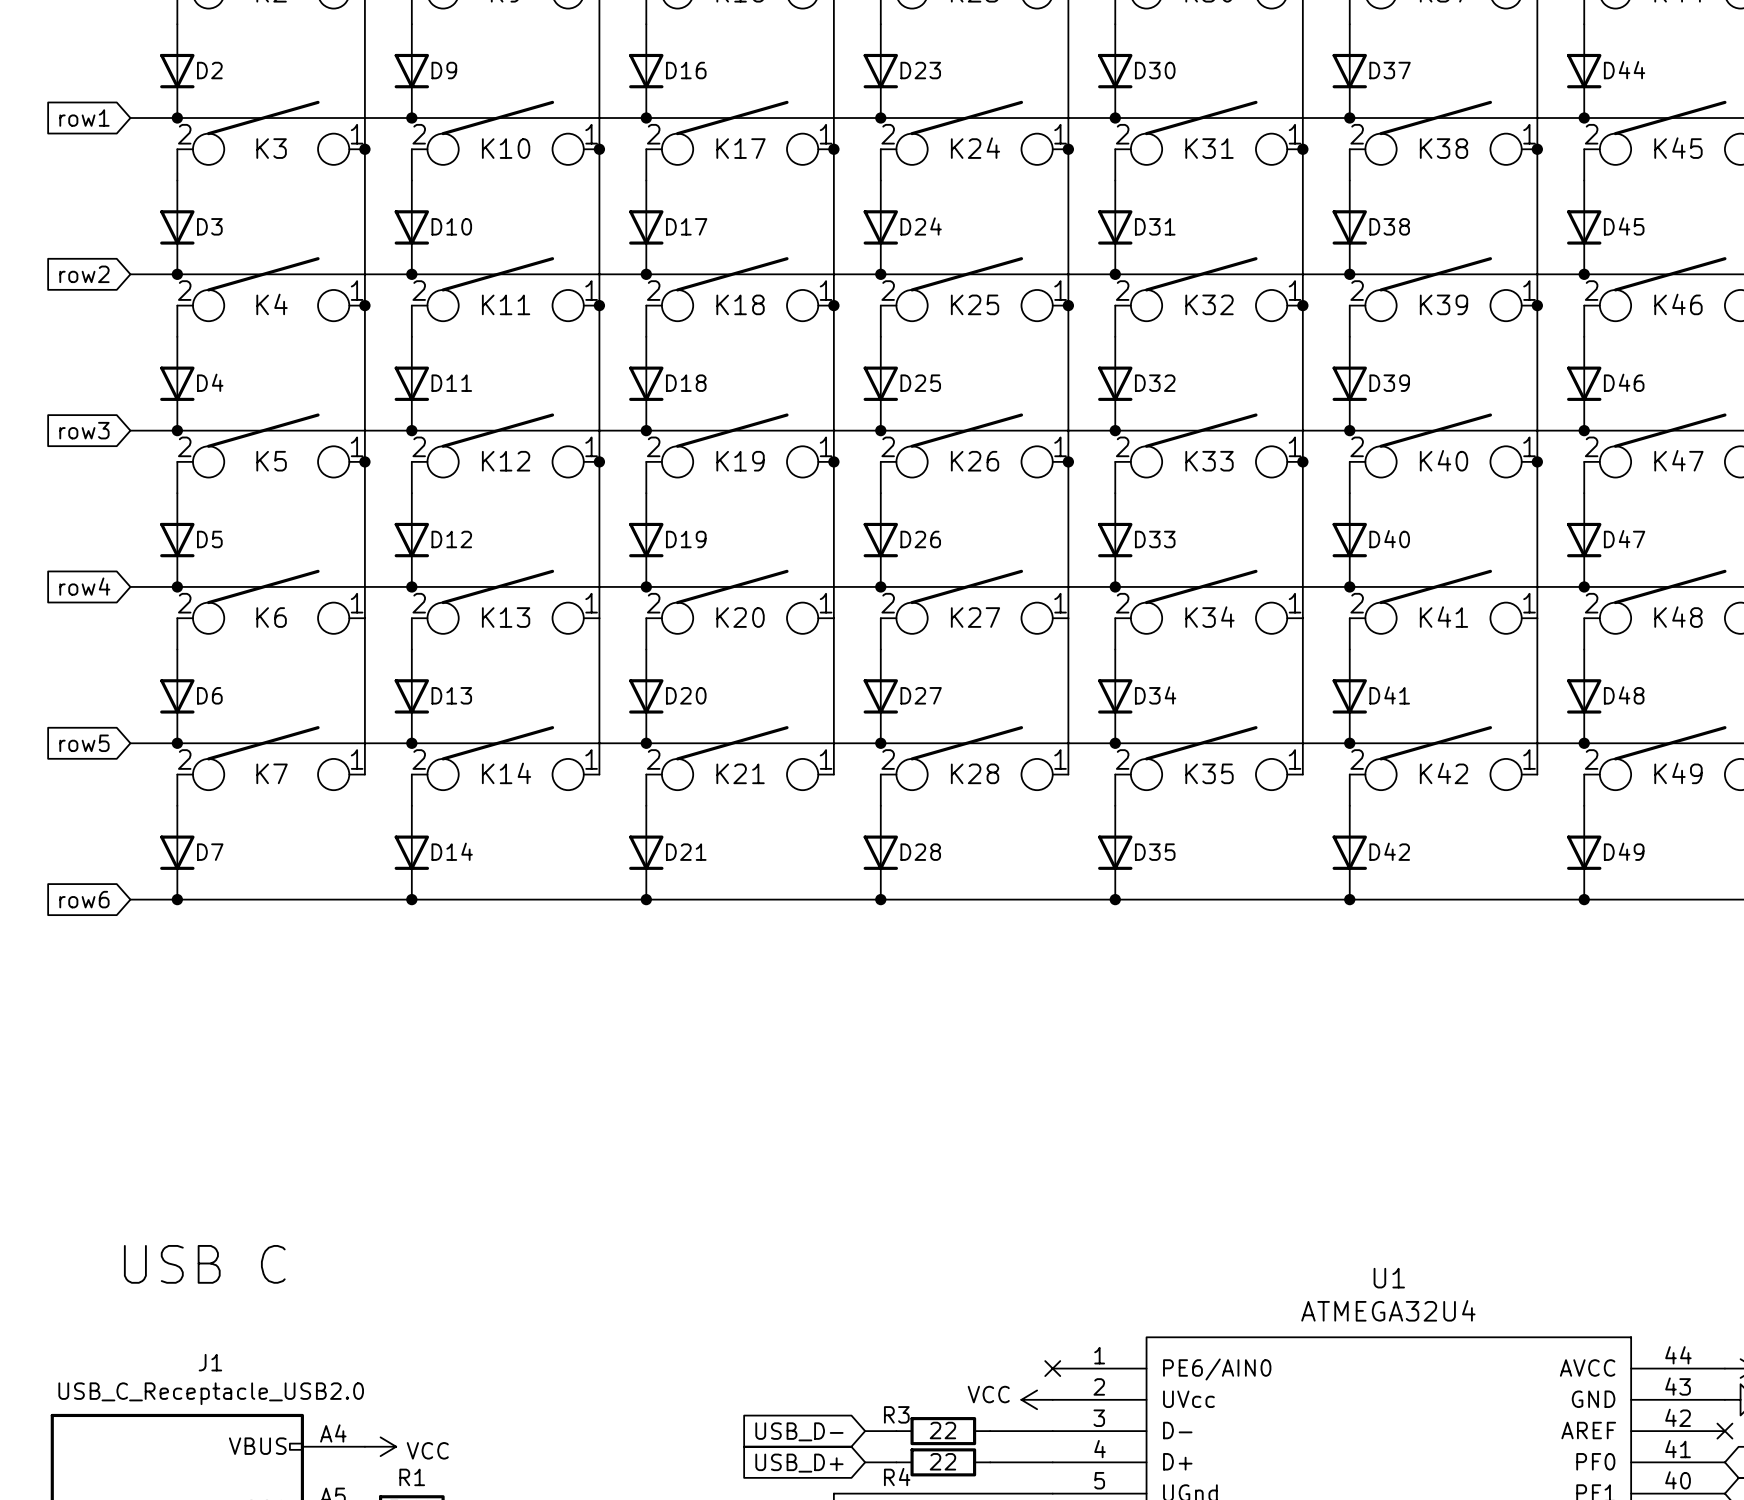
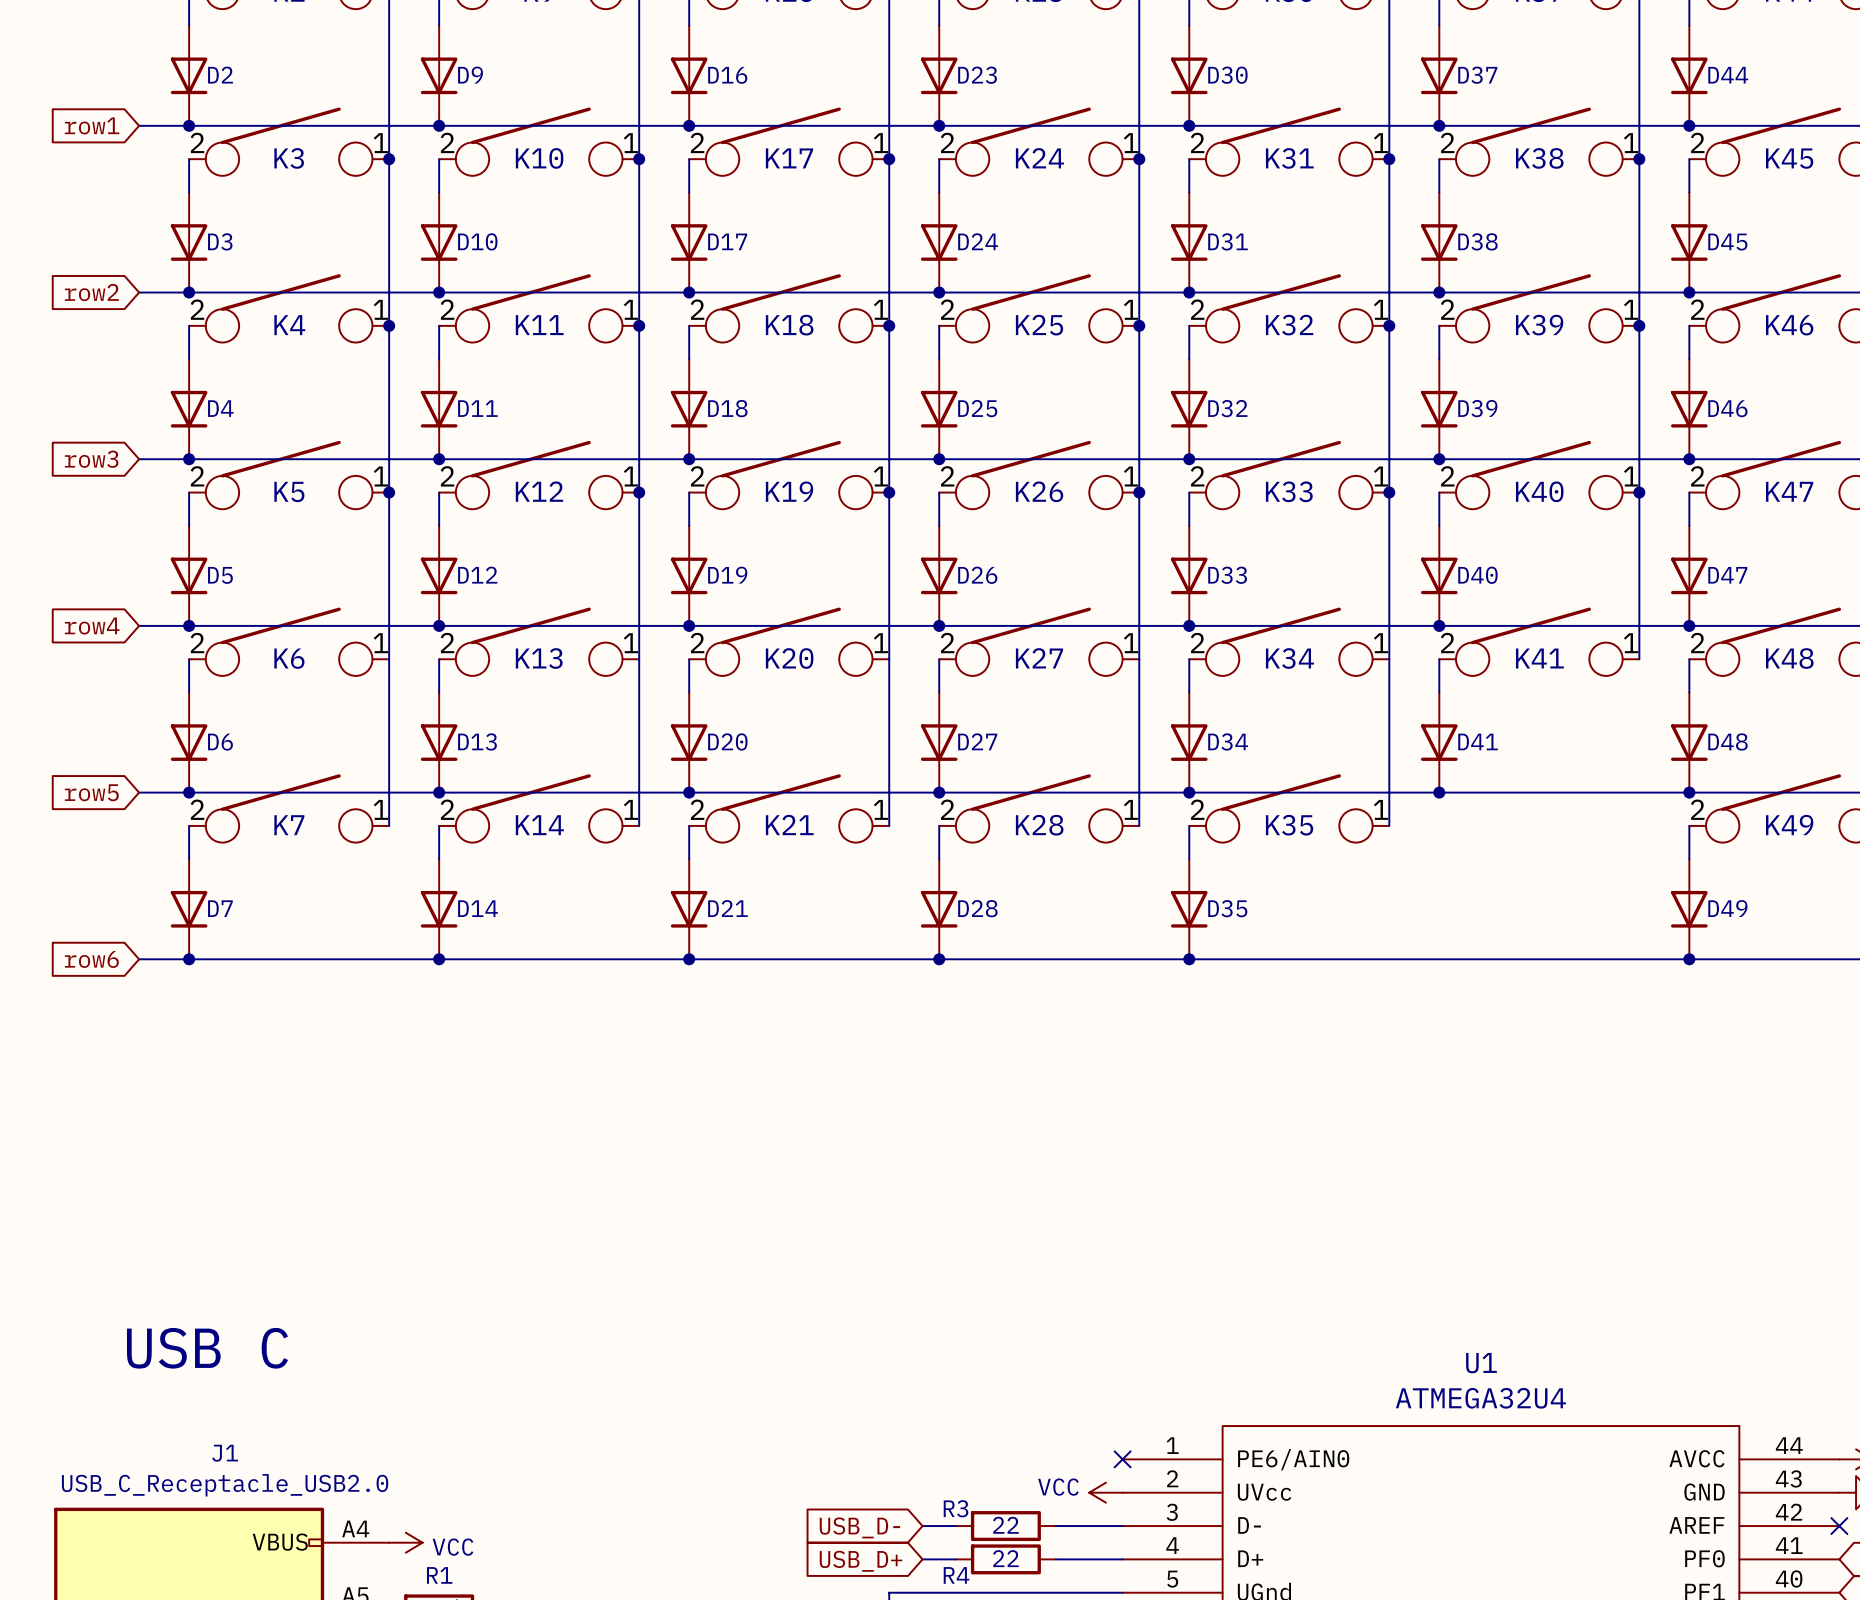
wire: (1537, 618) (1537, 774) -> none
K42: (1443, 758) -> none
wire: (1349, 774) (1349, 805) -> none
D42: (1349, 852) -> none
junction: (1349, 899) -> none

